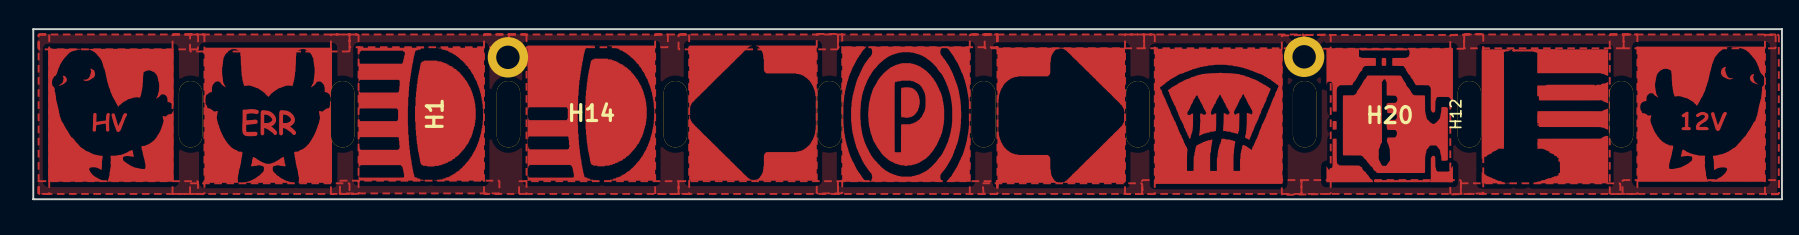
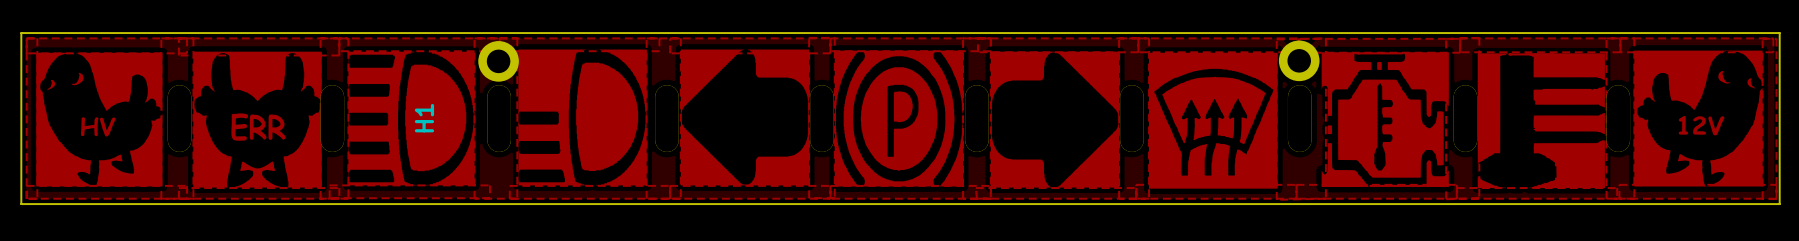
drawing: none -> [518, 49, 647, 186]
drawing: none -> [1321, 52, 1449, 188]
H14: (591, 113) -> none
H12 name: H12 (1455, 113) -> none
H20: (1389, 115) -> none

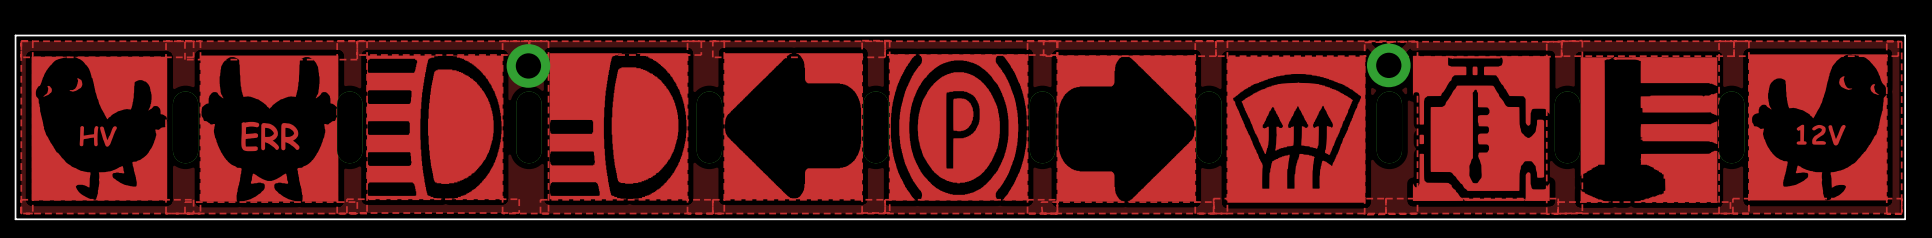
drawing: none -> [367, 55, 503, 200]
H1: (411, 118) -> none

